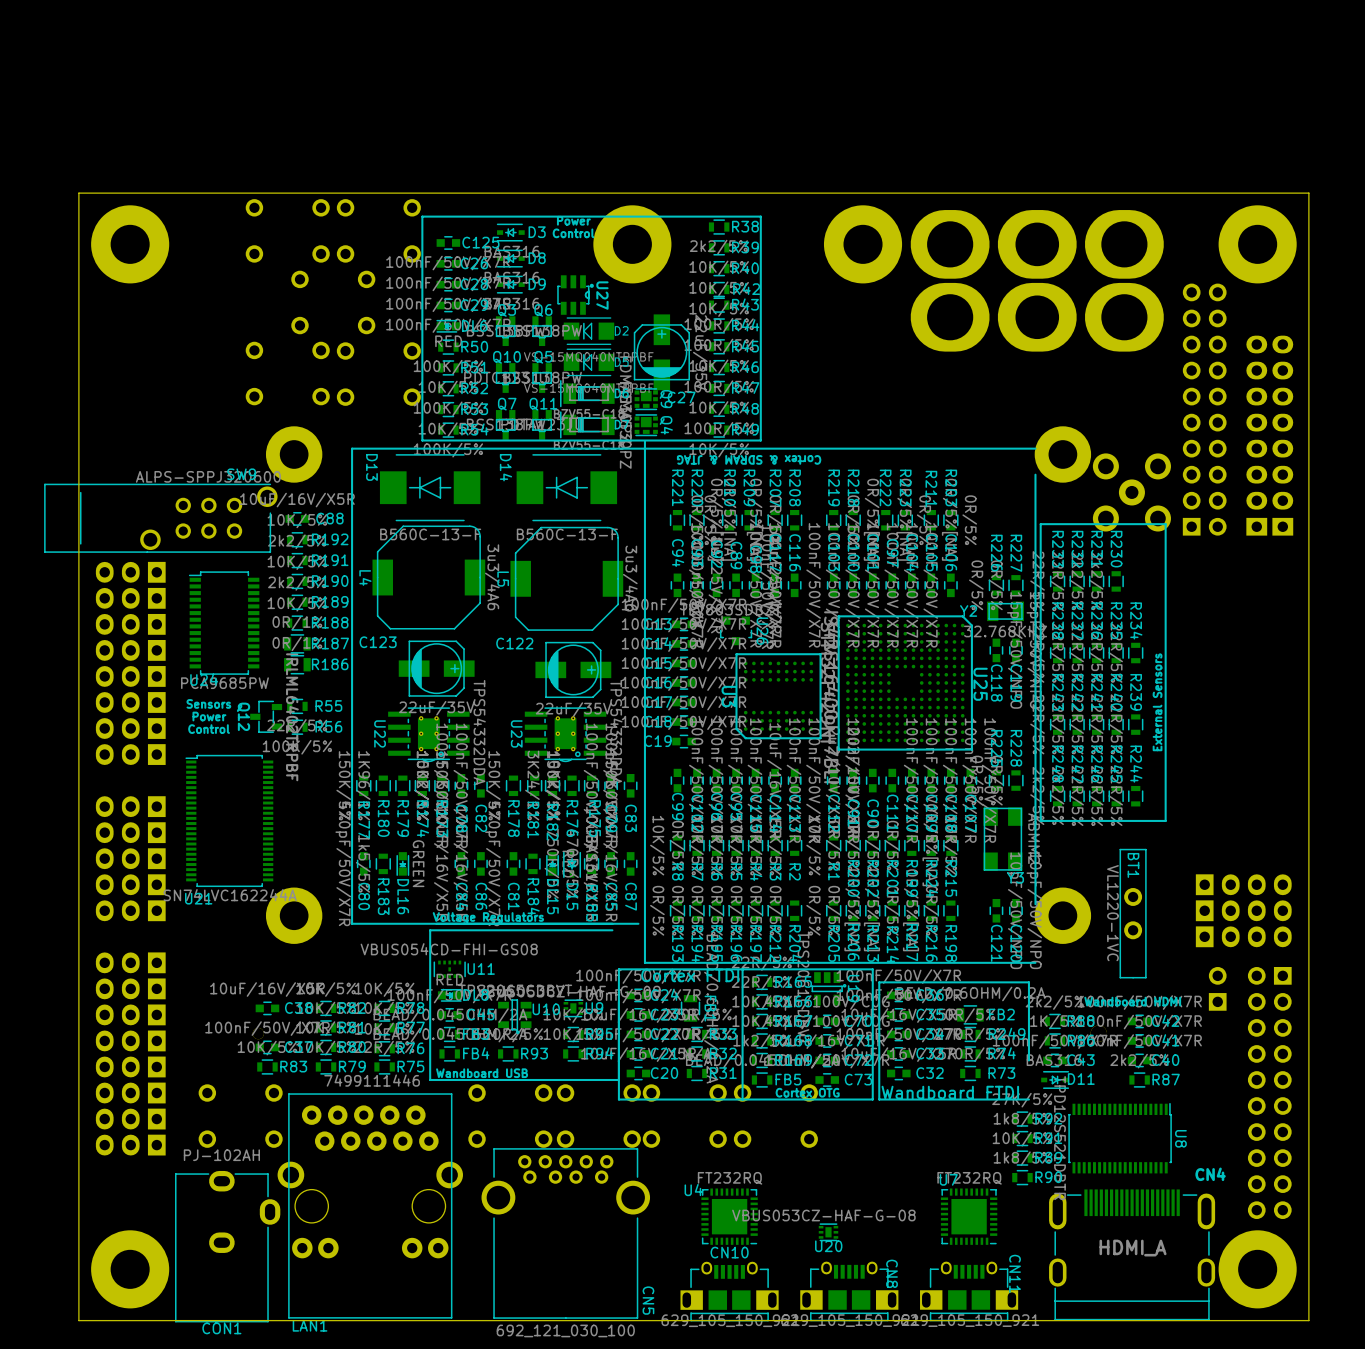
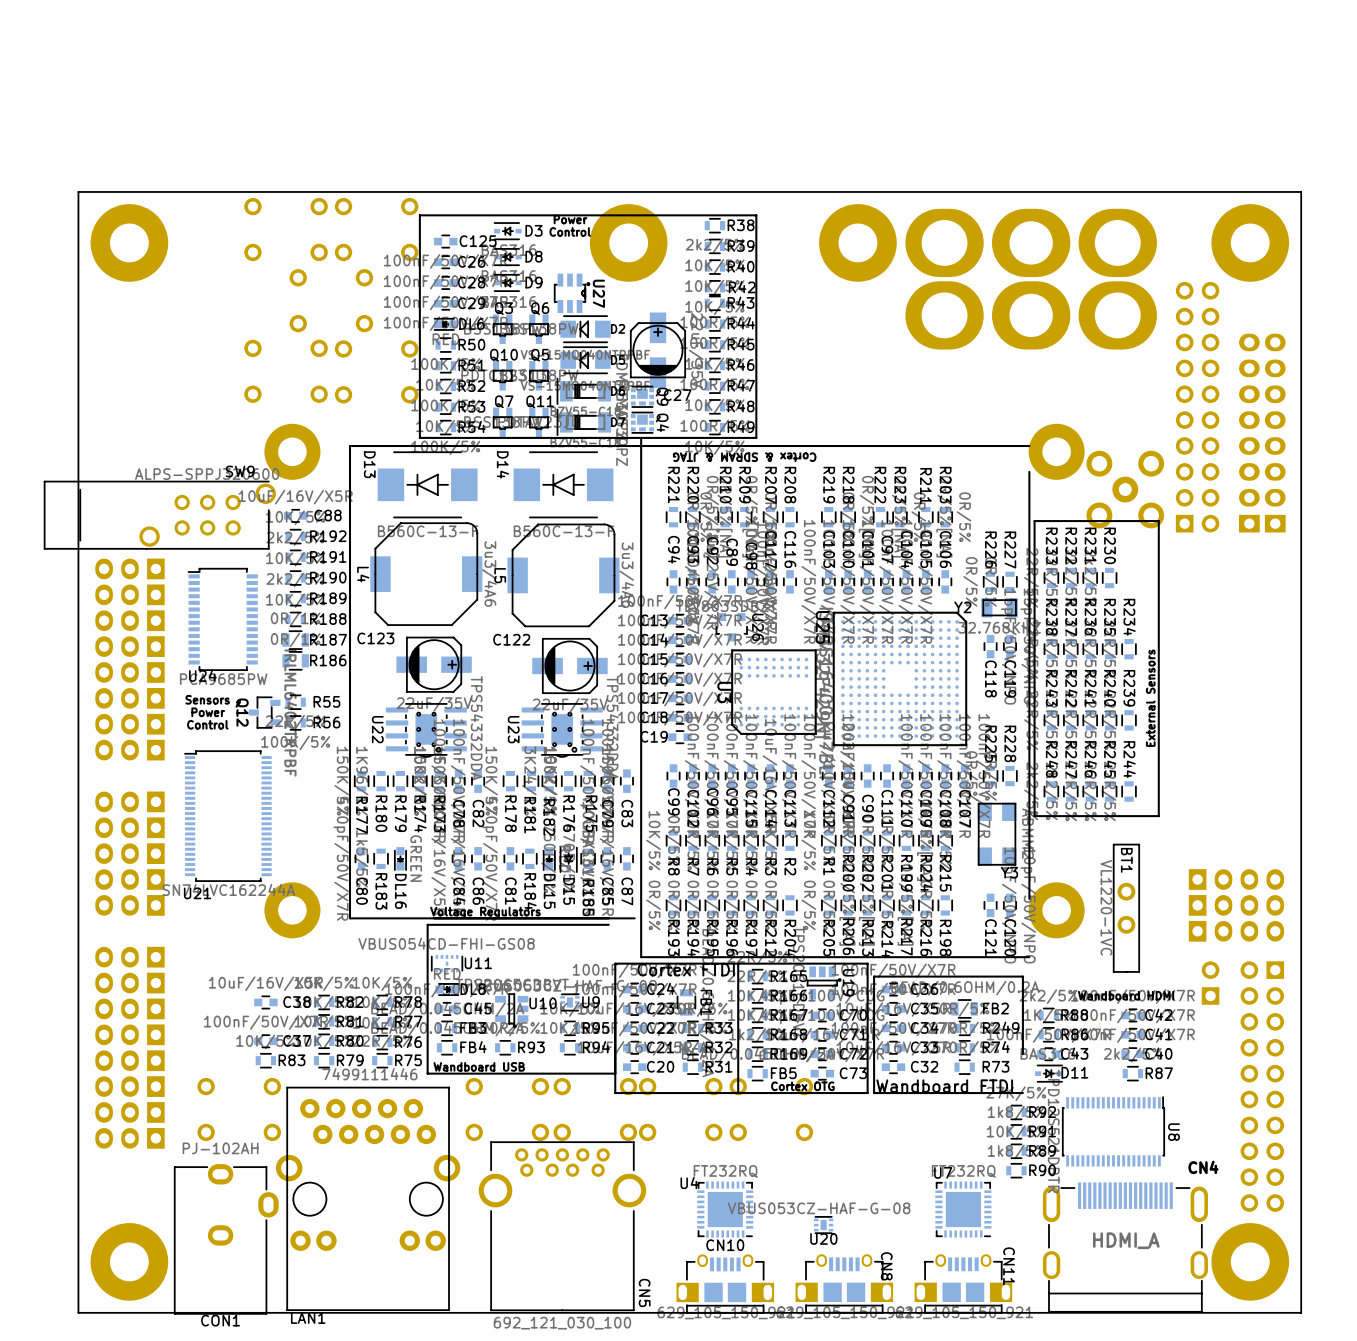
U25 name position: U25 (980, 684) -> U25 (822, 627)

